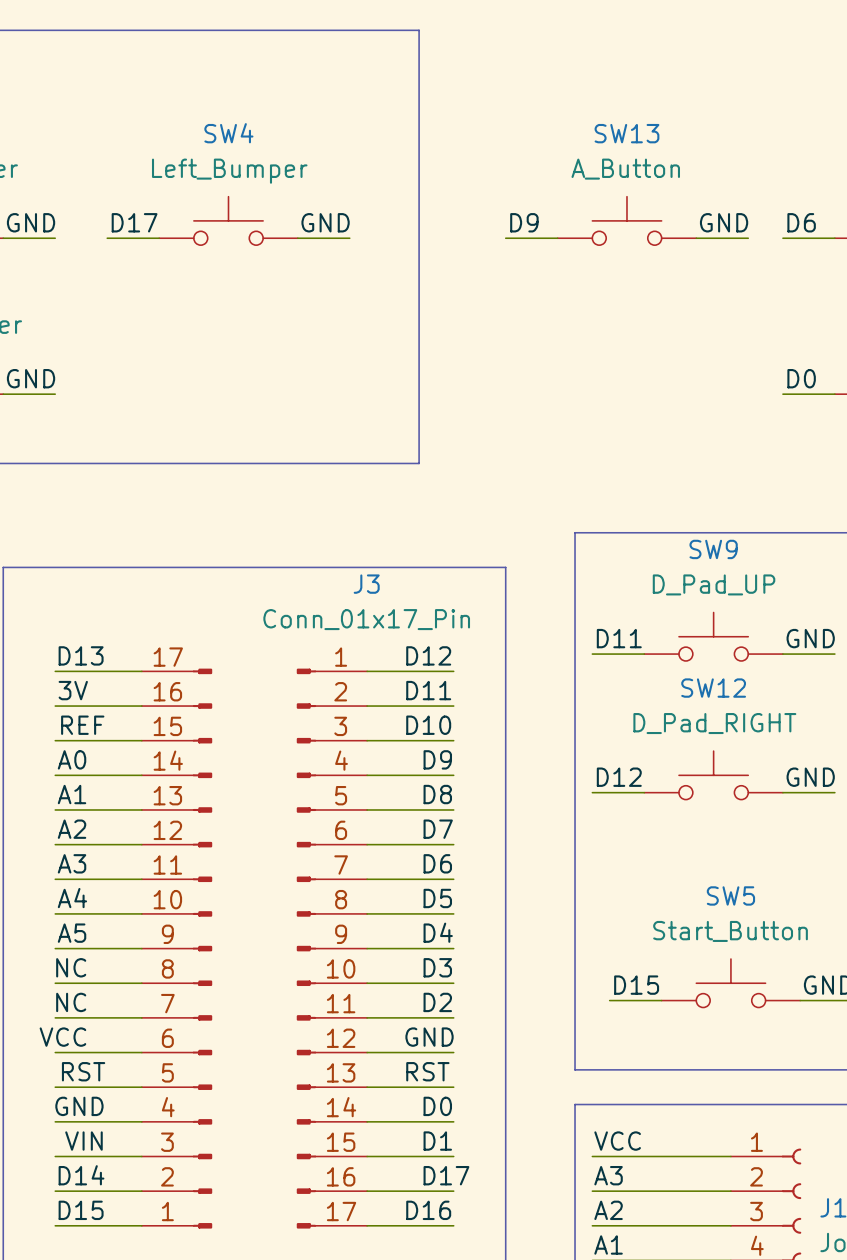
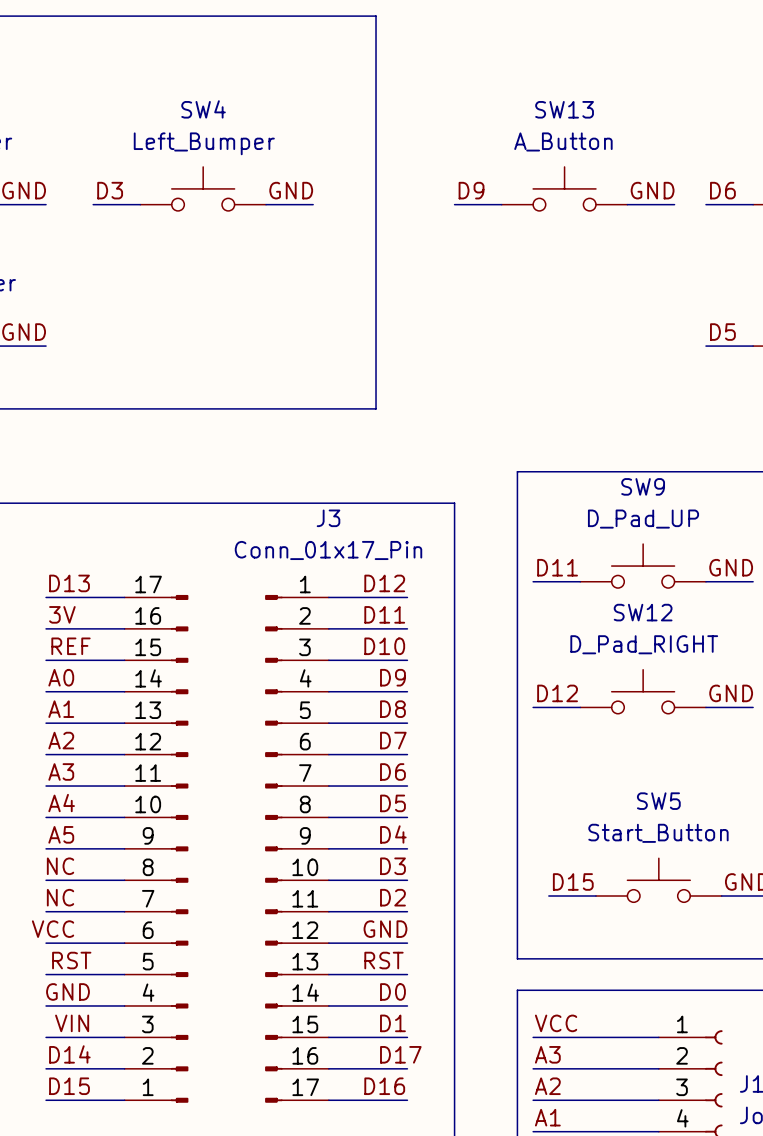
label: D17 (134, 222) -> D3 (110, 190)
label: D0 (801, 378) -> D5 (722, 332)

